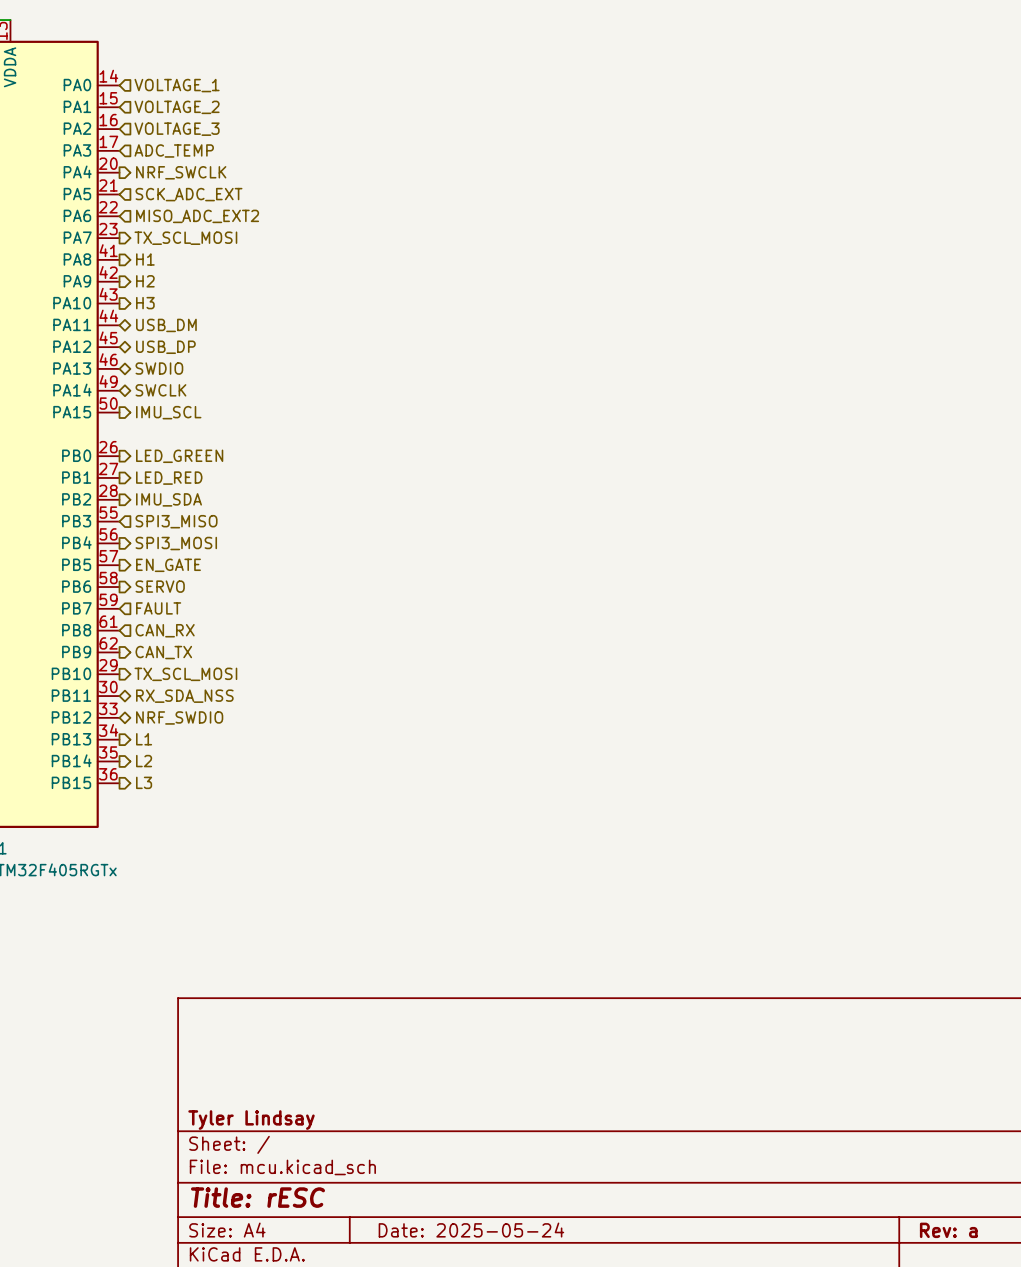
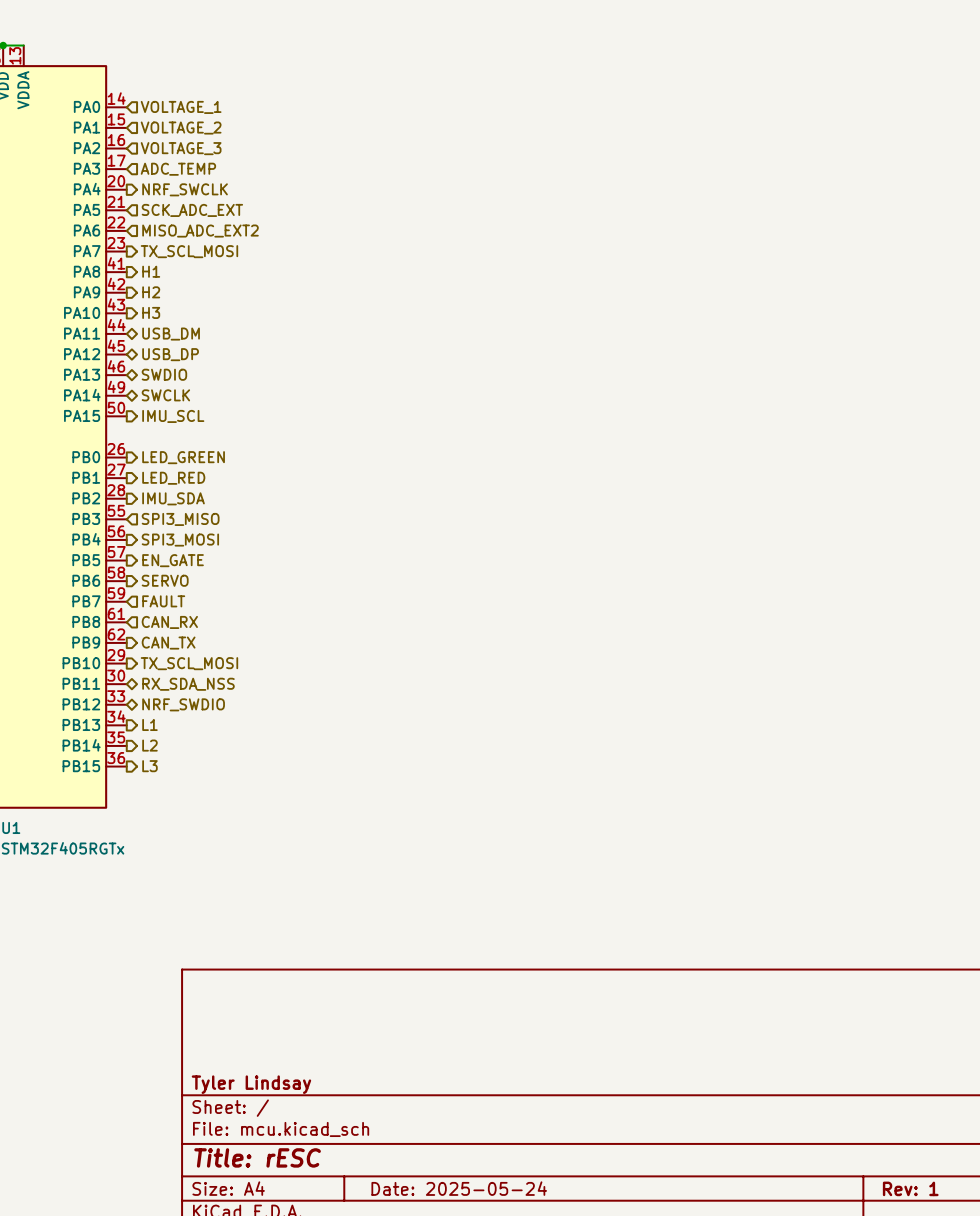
title block: Rev: a (948, 1230) -> Rev: 1 (910, 1188)

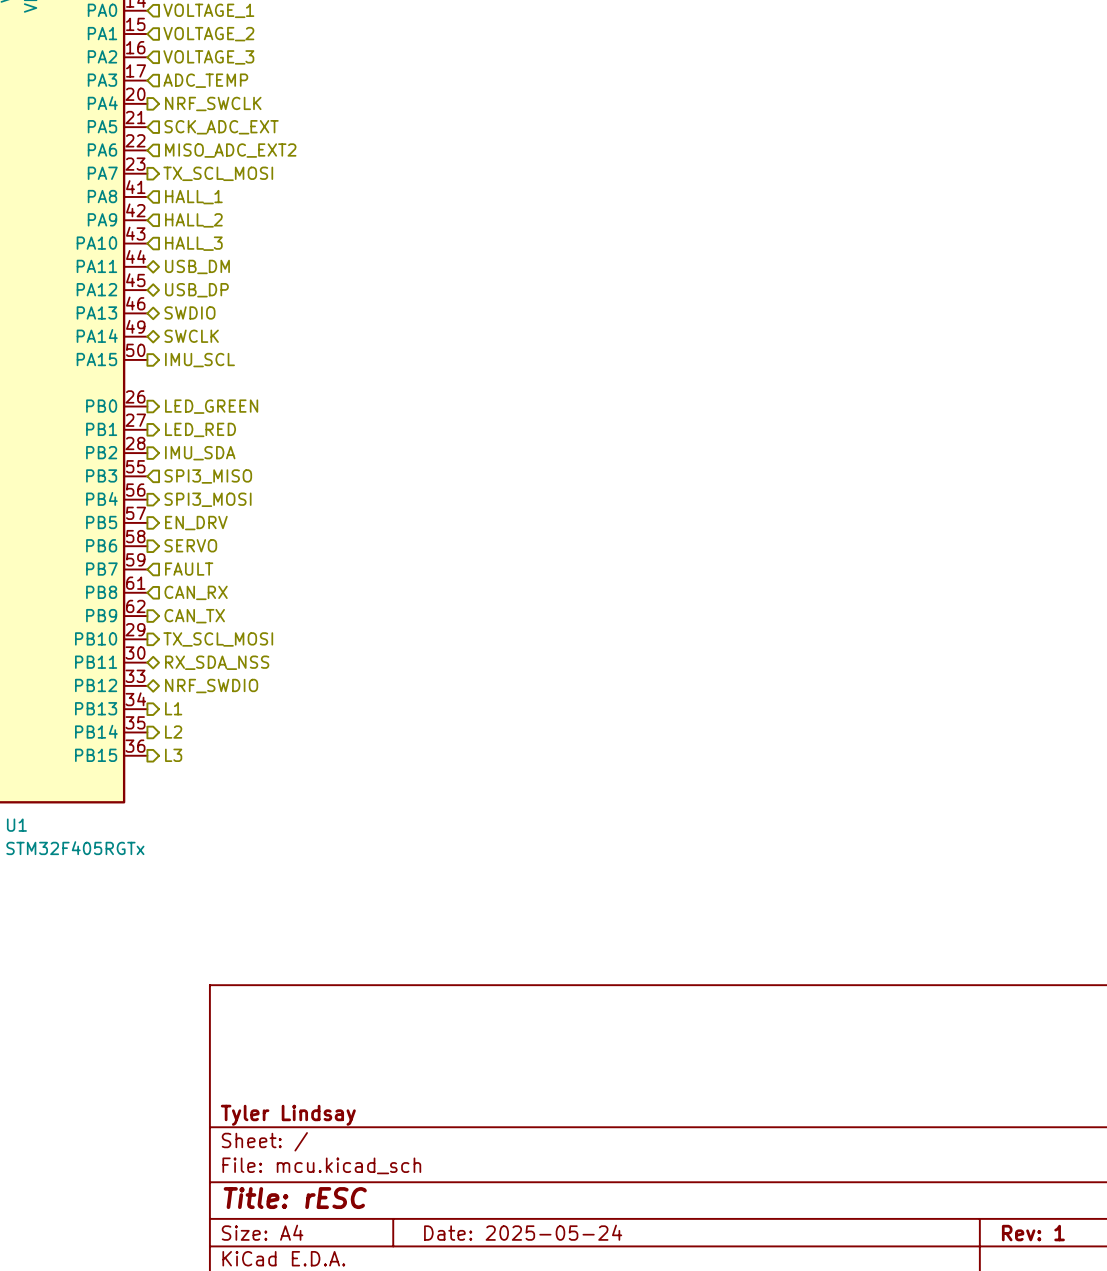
hierarchical label shape: output (151, 271) -> input (193, 197)
hierarchical label: H1 (151, 271) -> HALL_1 (193, 197)
hierarchical label shape: output (151, 292) -> input (193, 220)
hierarchical label: H2 (151, 292) -> HALL_2 (193, 220)
hierarchical label shape: output (151, 312) -> input (193, 243)
hierarchical label: H3 (151, 312) -> HALL_3 (193, 243)
hierarchical label: EN_GATE (173, 560) -> EN_DRV (196, 523)

